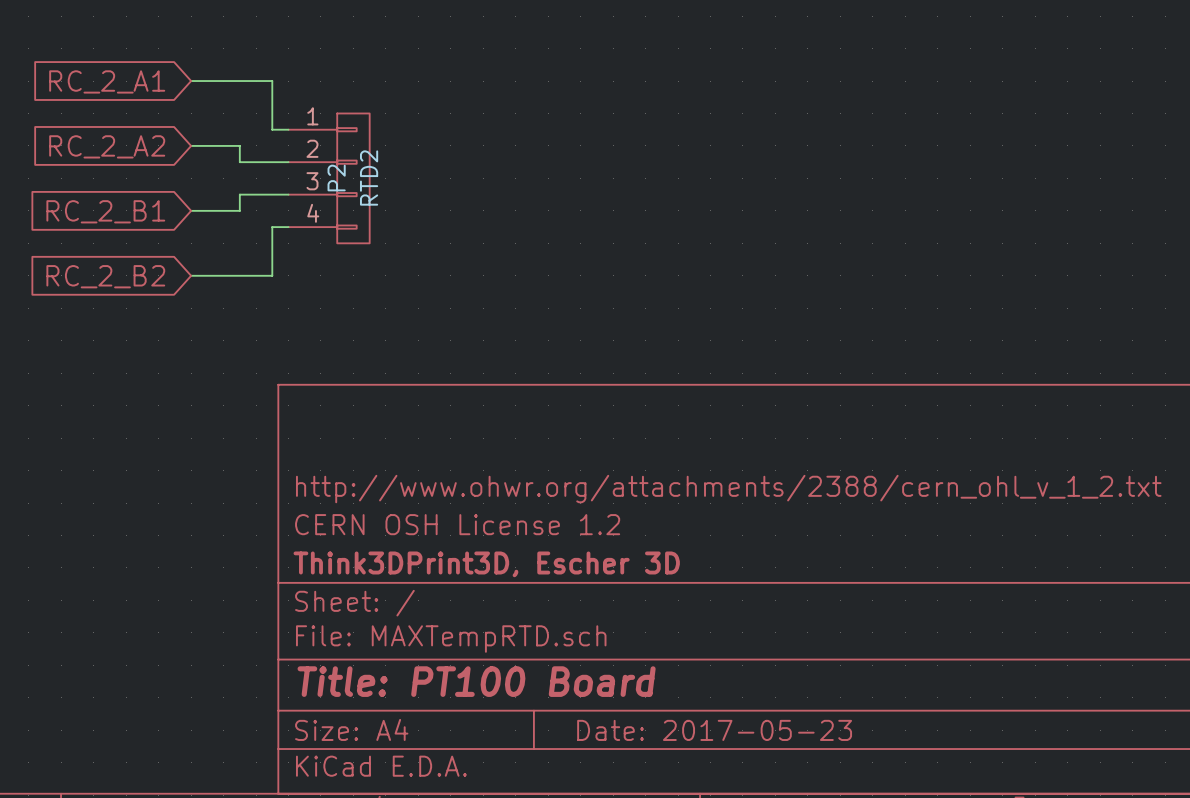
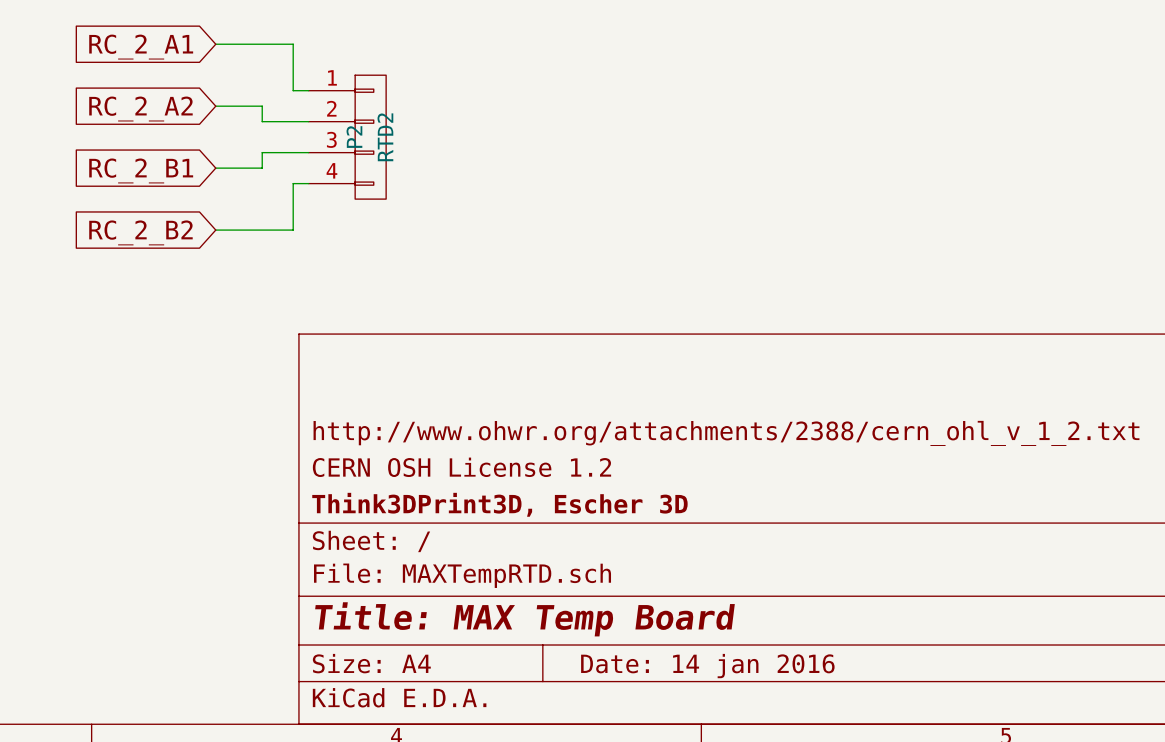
title block: Title: PT100 Board (476, 681) -> Title: MAX Temp Board (524, 619)
title block: Date: 2017-05-23 (714, 730) -> Date: 14 jan 2016 (707, 666)

